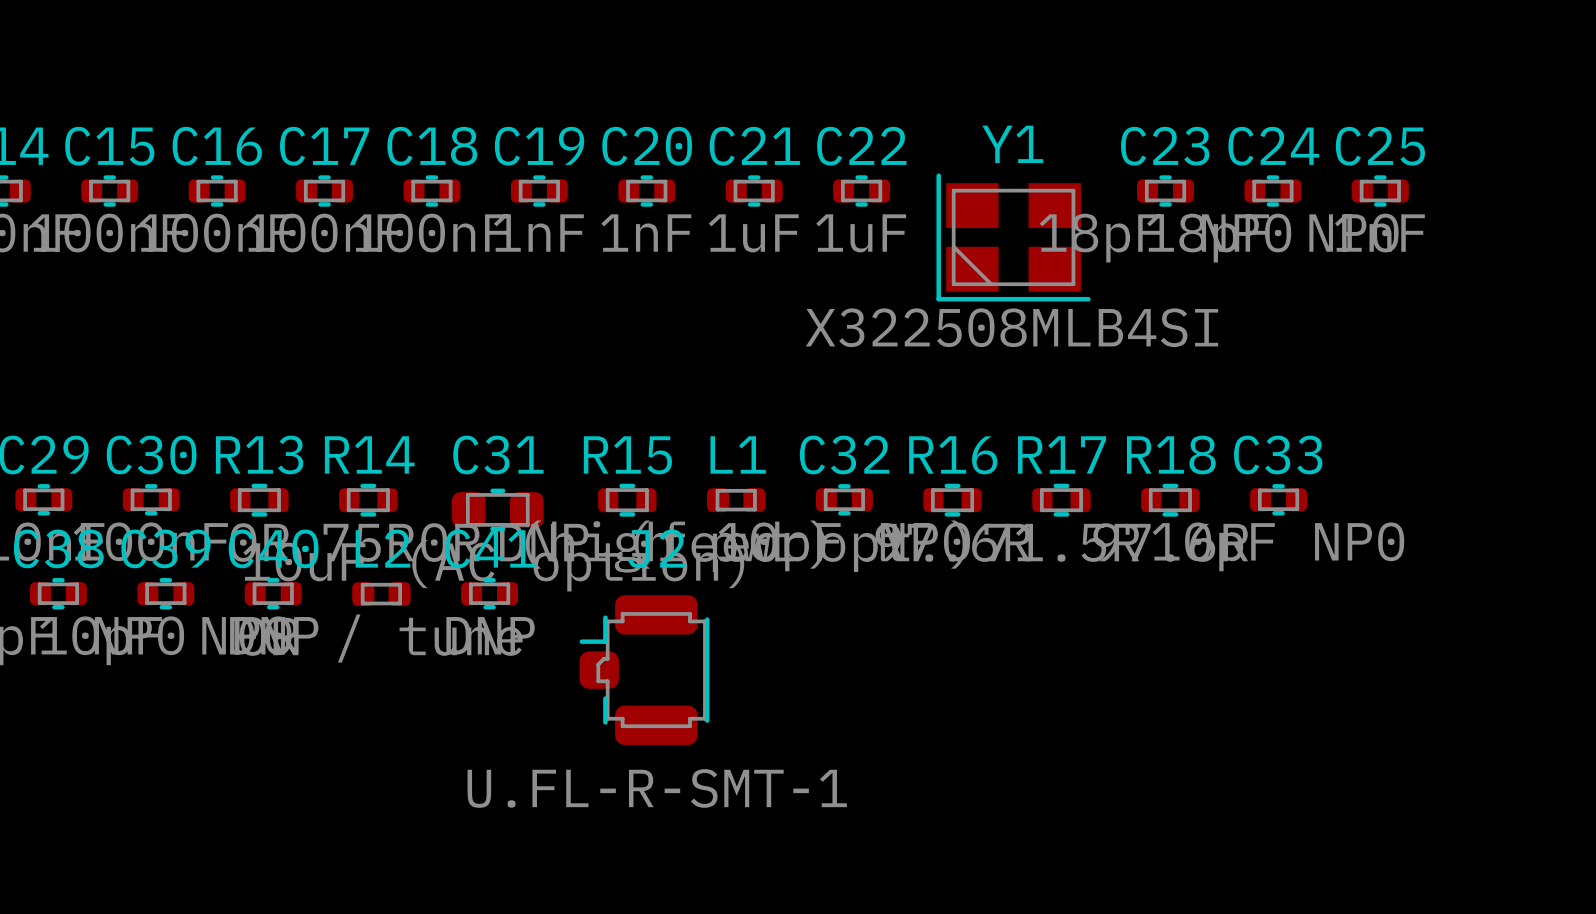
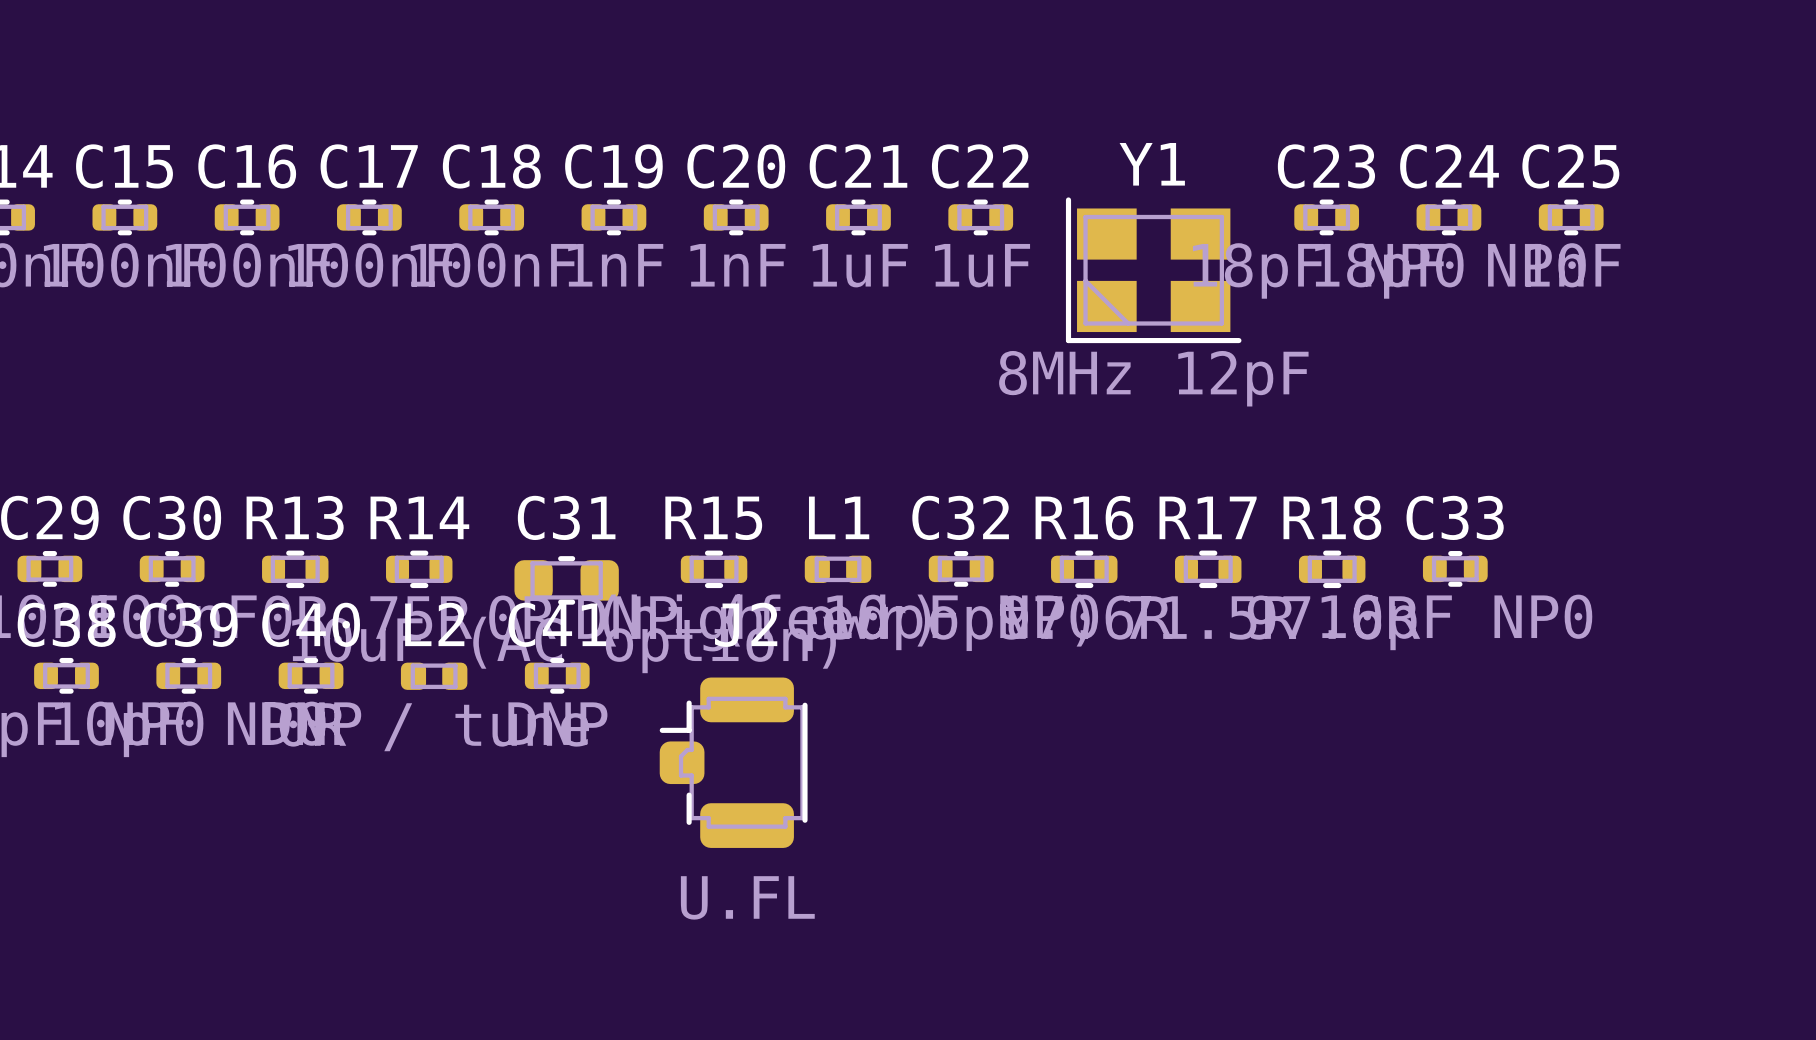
Y1 value: X322508MLB4SI (1012, 327) -> 8MHz 12pF (1153, 378)
J2 value: U.FL-R-SMT-1 (657, 788) -> U.FL (747, 897)

